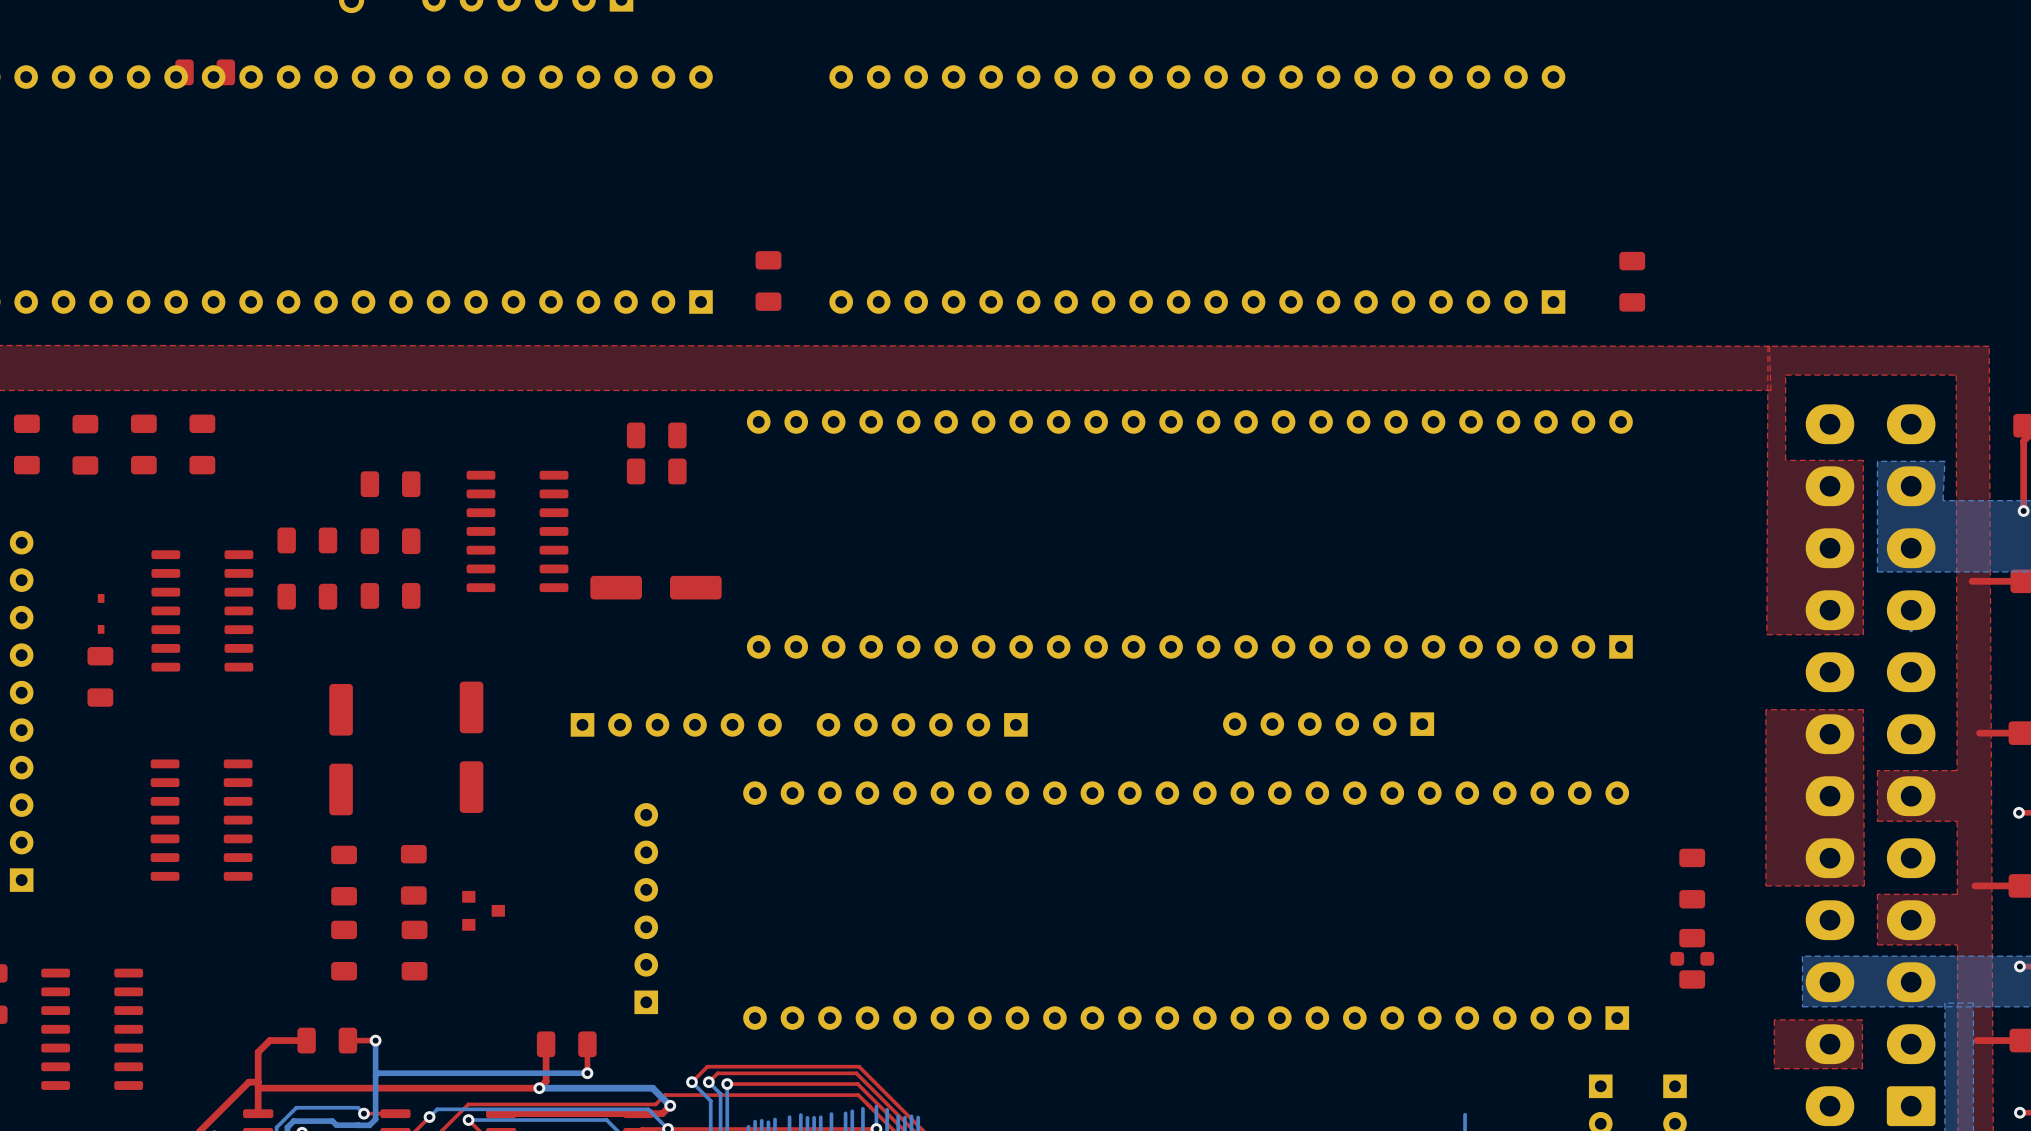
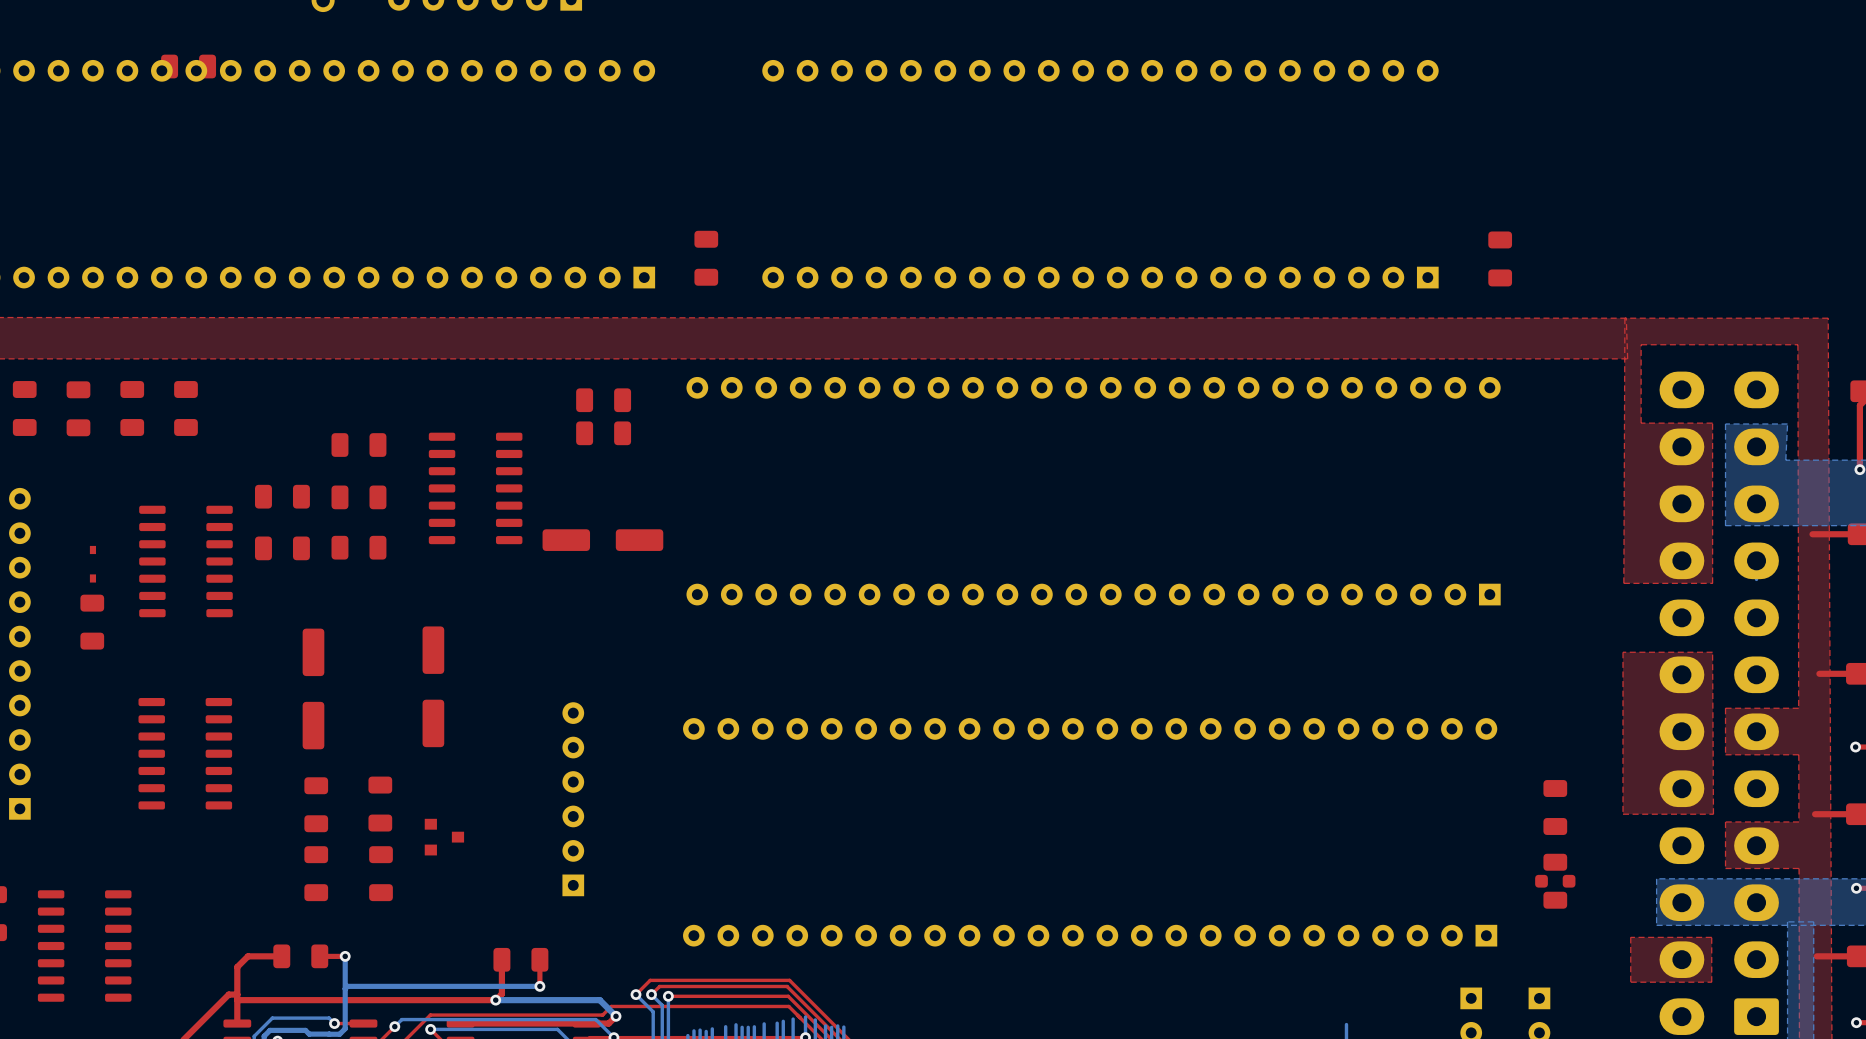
part: (676, 724) -> none
part: (922, 724) -> none
part: (1328, 724) -> none
part position: (646, 908) -> (573, 799)

